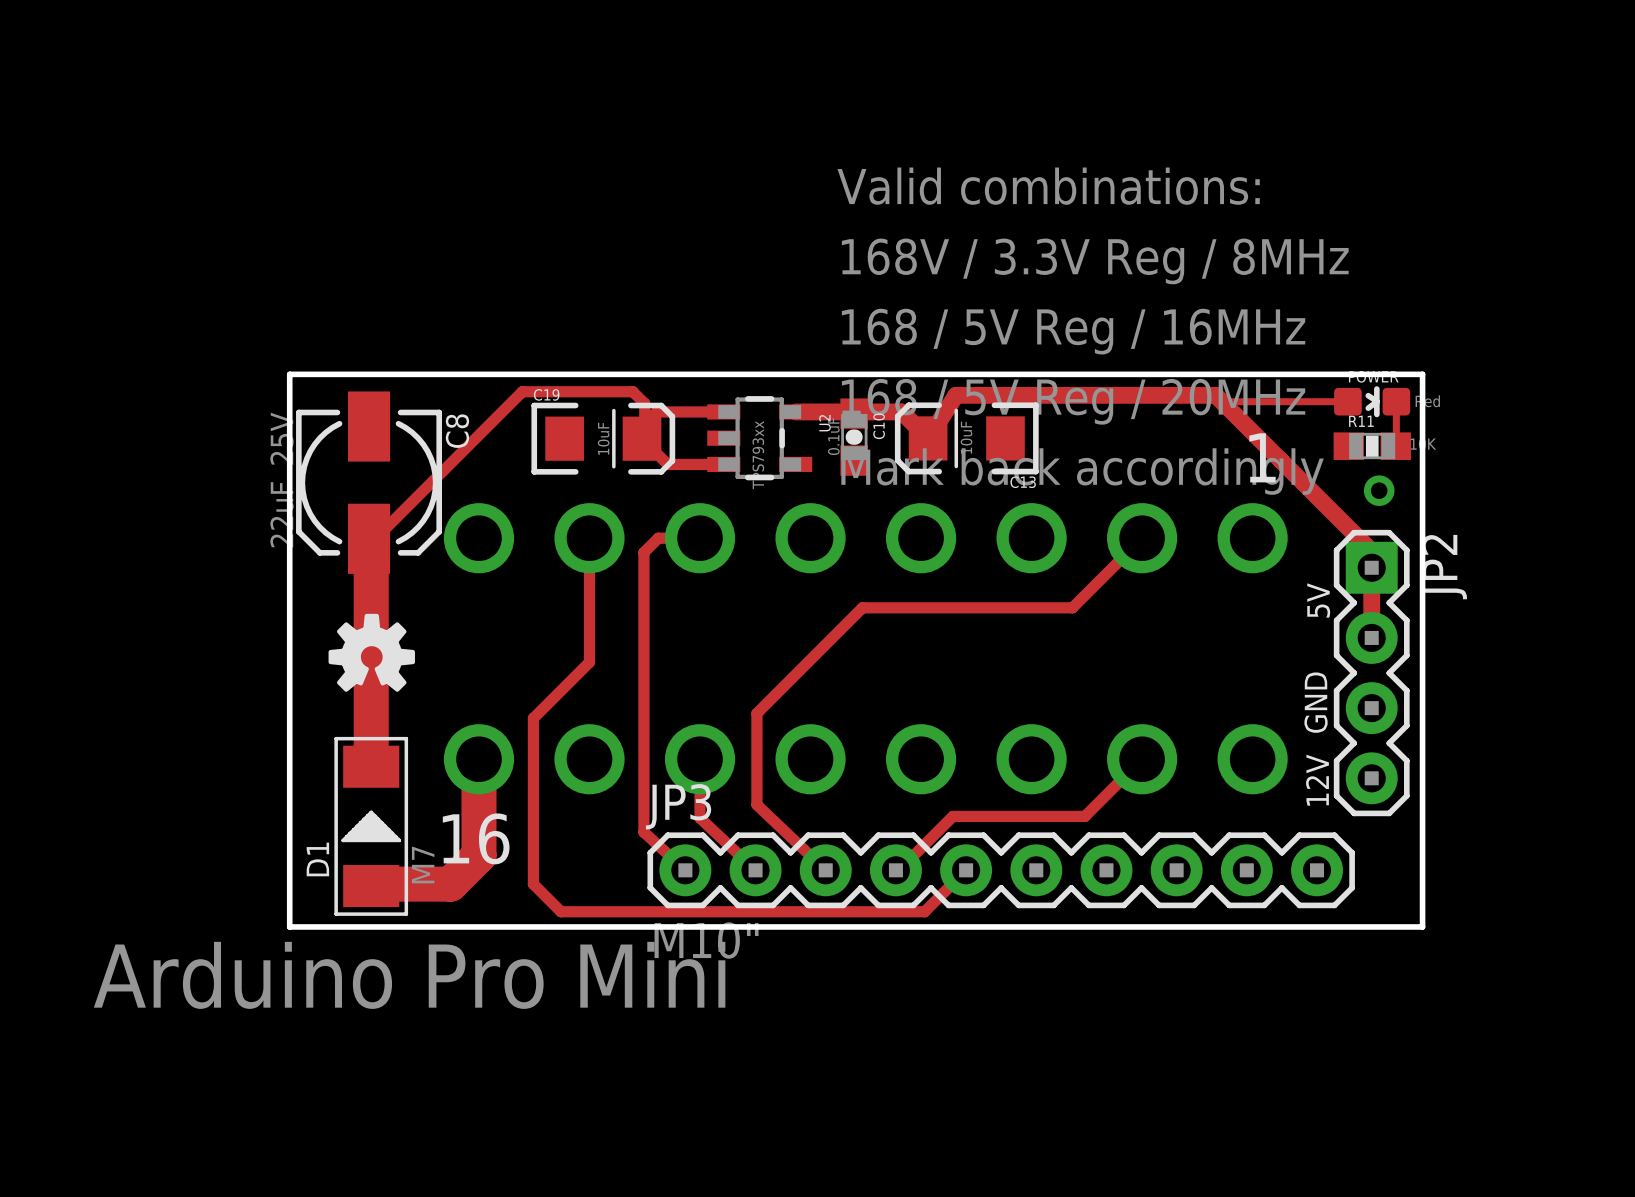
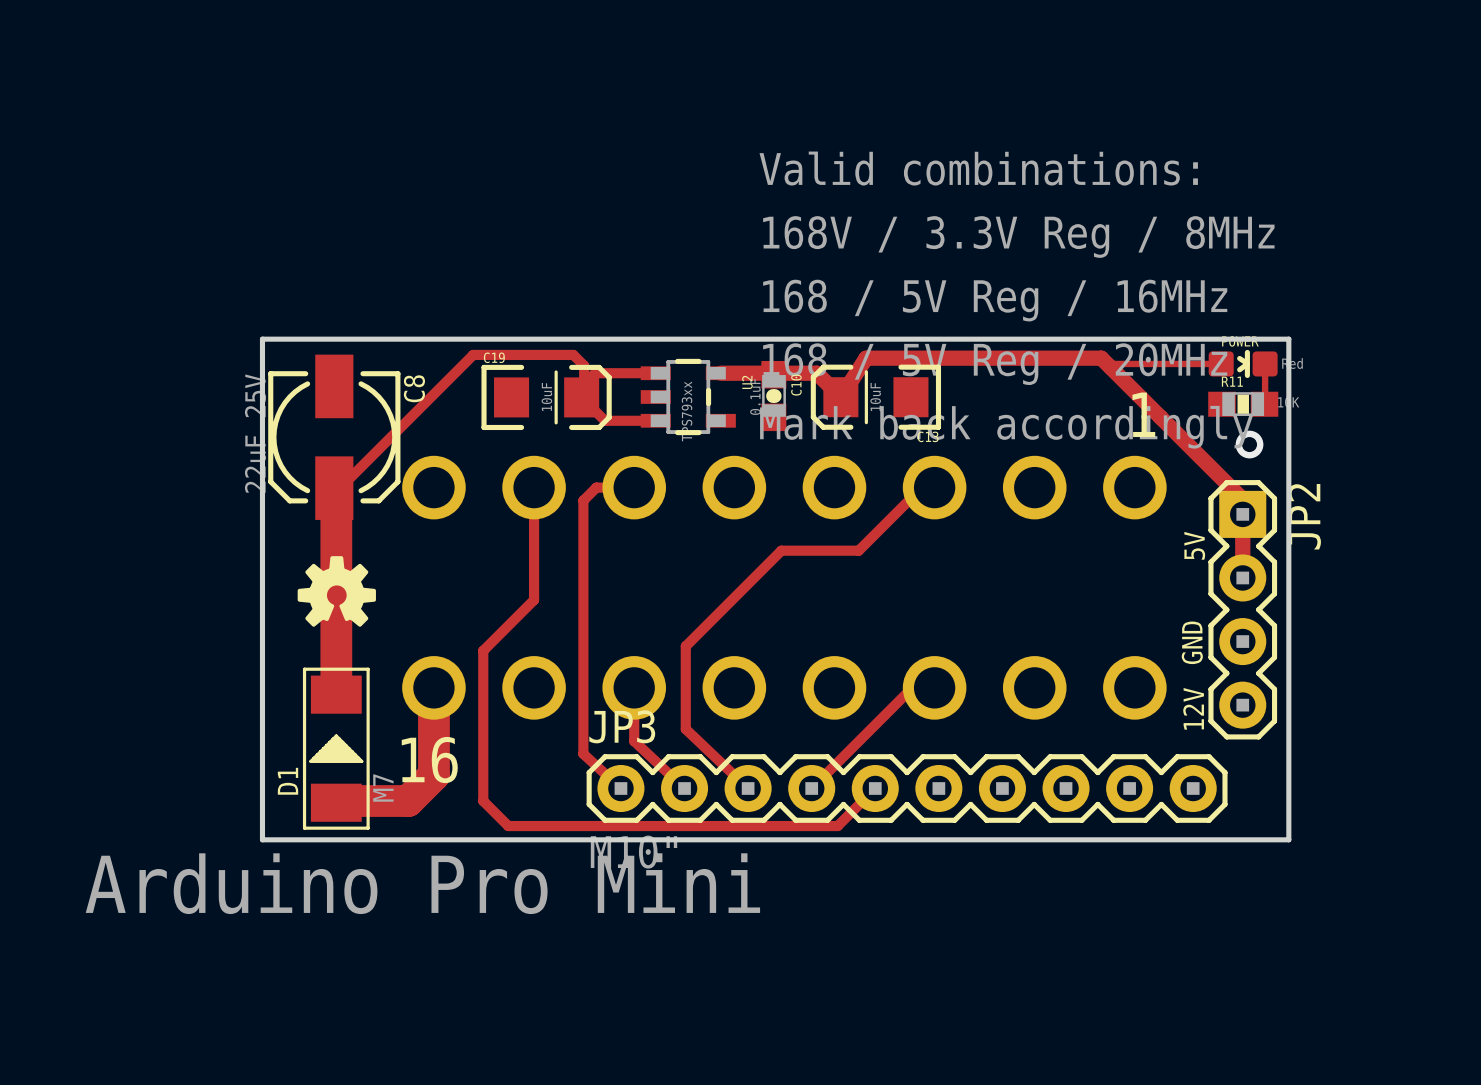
track: (1142, 538) (1072, 607) (947, 607) -> (934, 487) (921, 487) (858, 550)
track: (1142, 759) (1084, 816) (952, 816) (895, 873) (895, 870) -> (934, 687) (912, 687) (811, 788)

